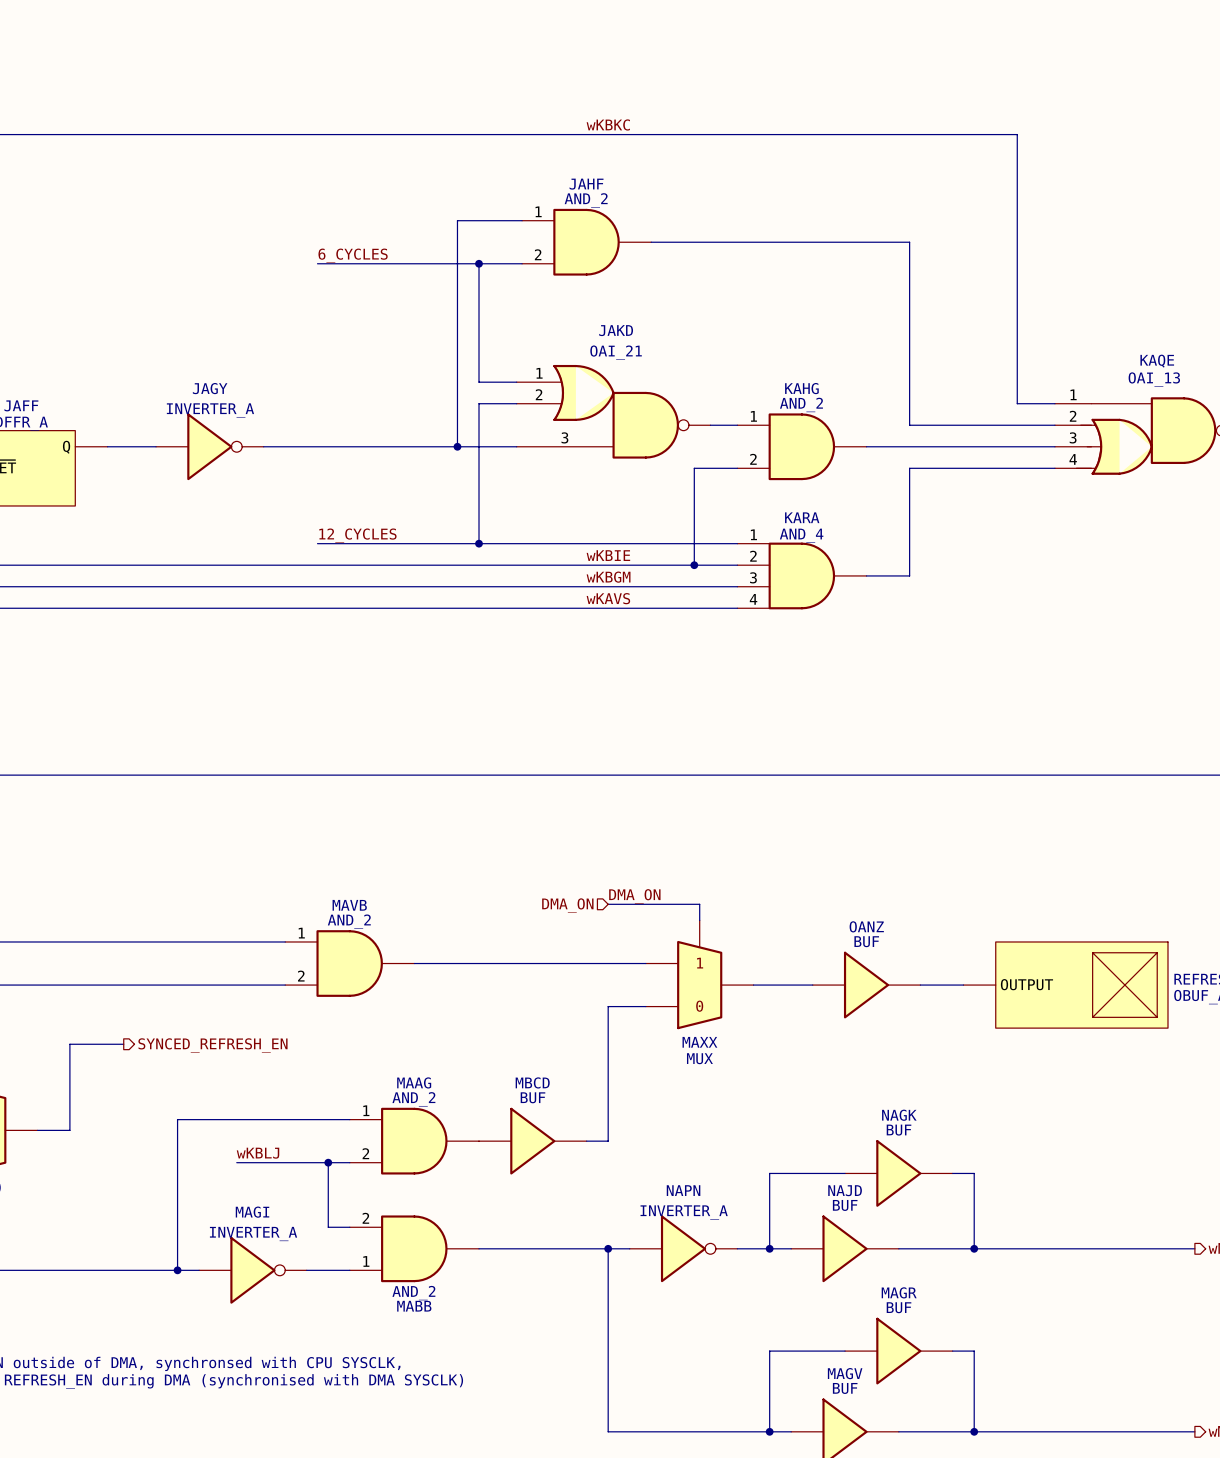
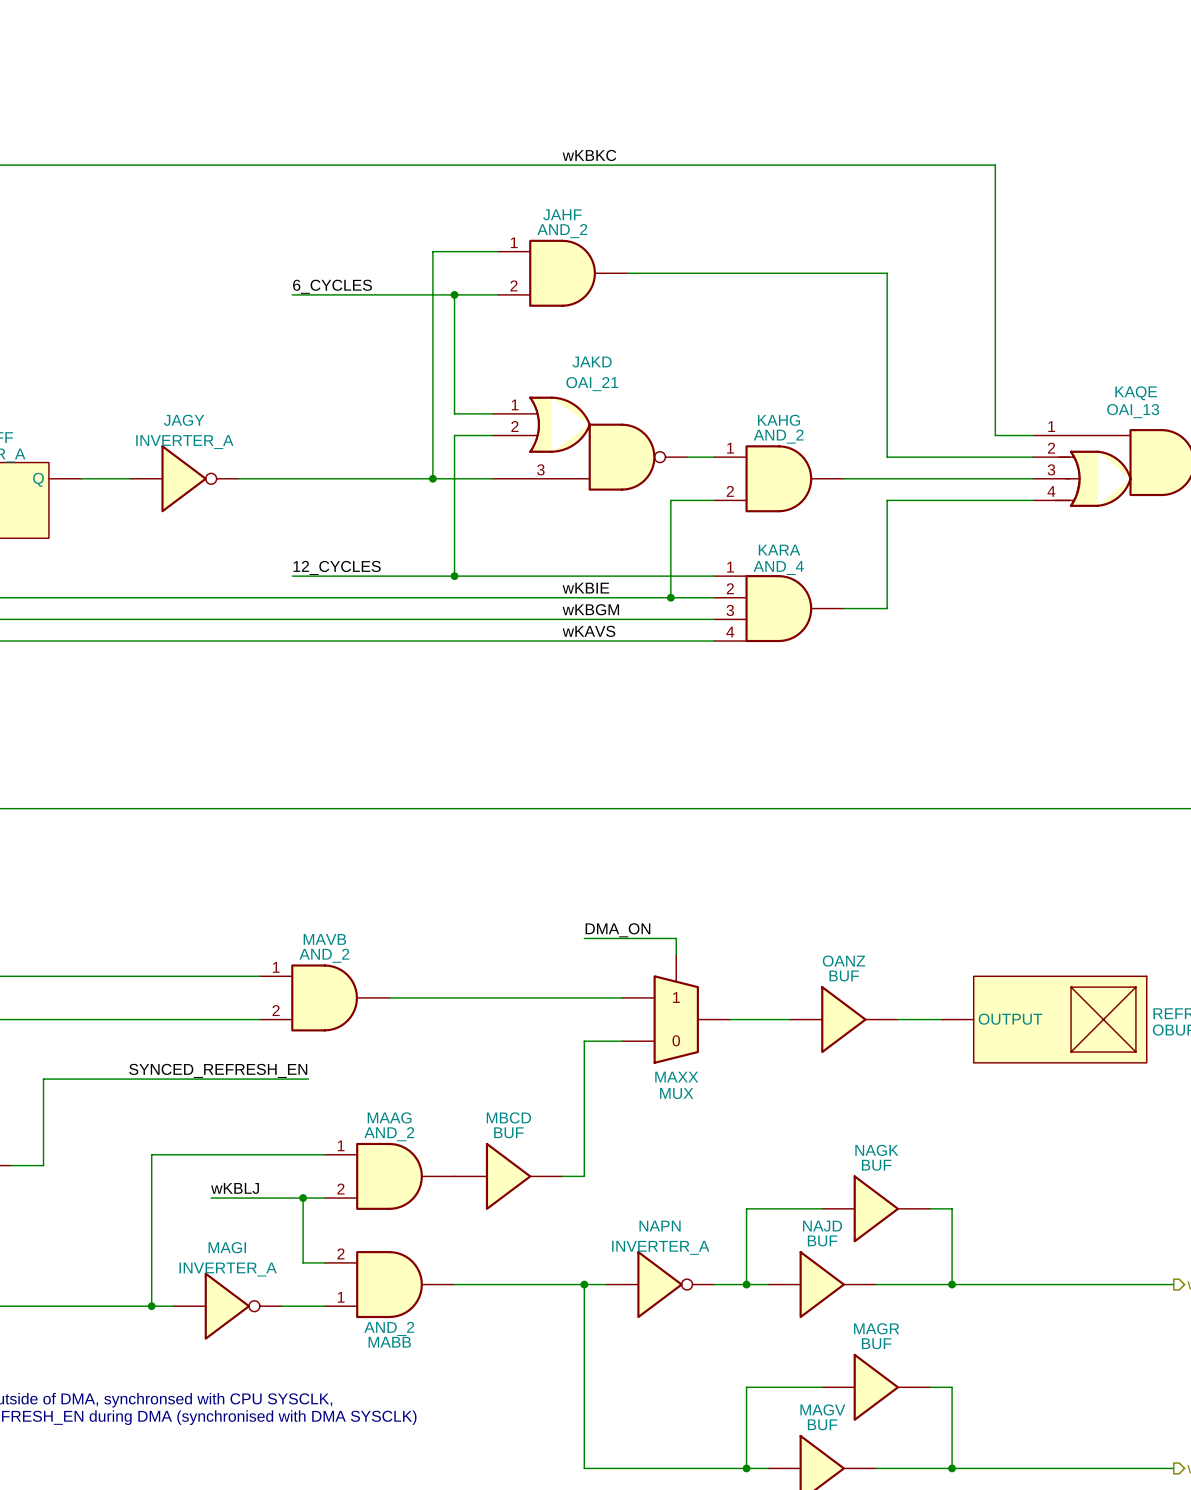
hierarchical label: DMA_ON (567, 905) -> none
label: none -> SYNCED_REFRESH_EN (218, 1070)
wire: none -> (97, 1079) (308, 1079)
hierarchical label: SYNCED_REFRESH_EN (212, 1045) -> none

